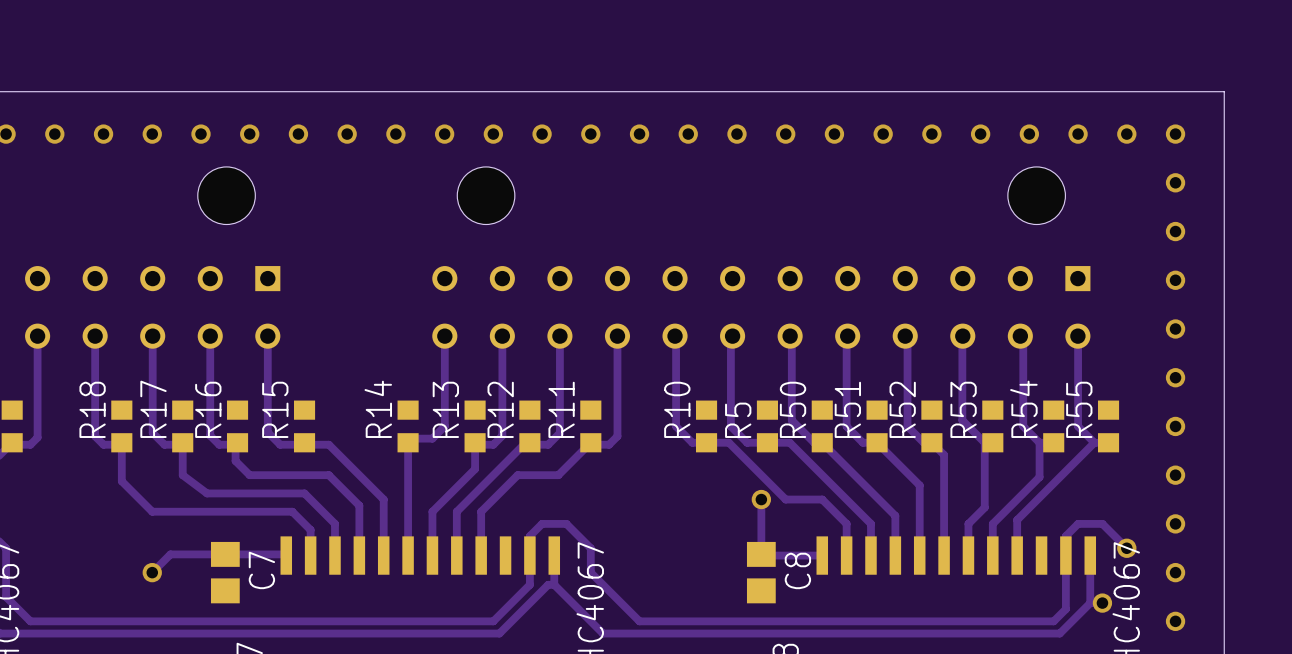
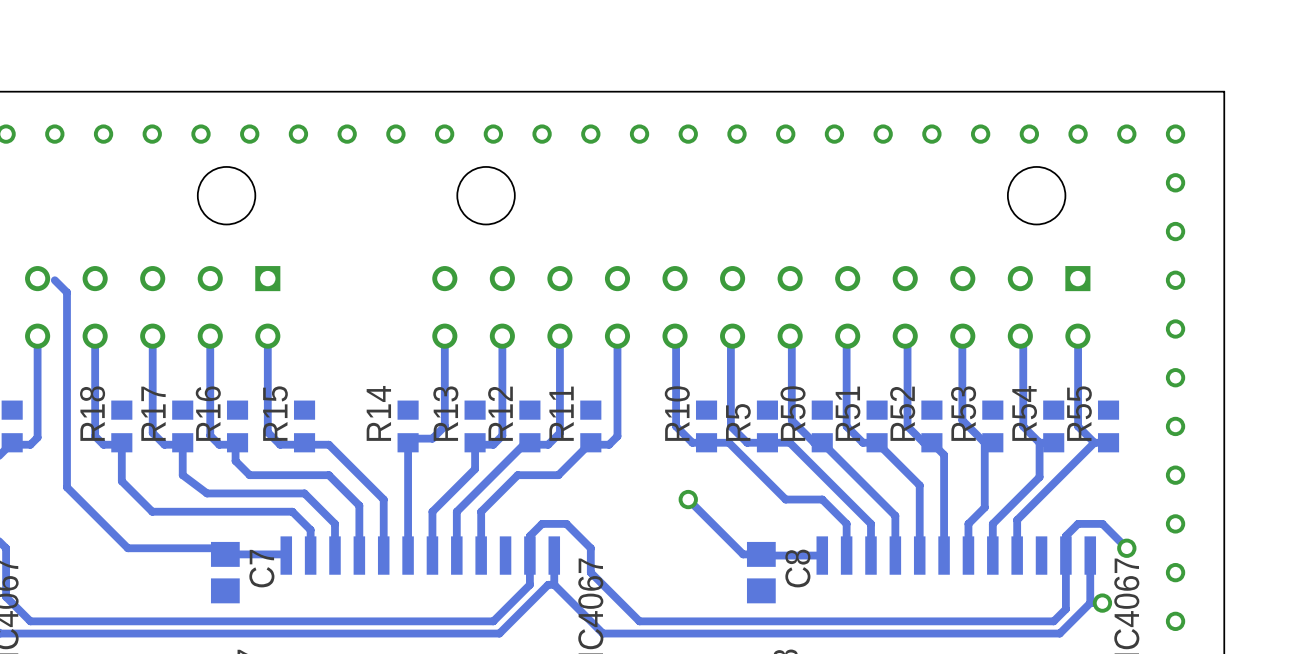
track: (761, 499) (761, 554) -> (688, 499) (743, 554) (761, 554)
via position: (761, 499) -> (688, 499)
track: (225, 554) (170, 554) (152, 572) -> (225, 554) (225, 548) (127, 548) (66, 487) (66, 292) (54, 280)
via: (152, 572) -> none

